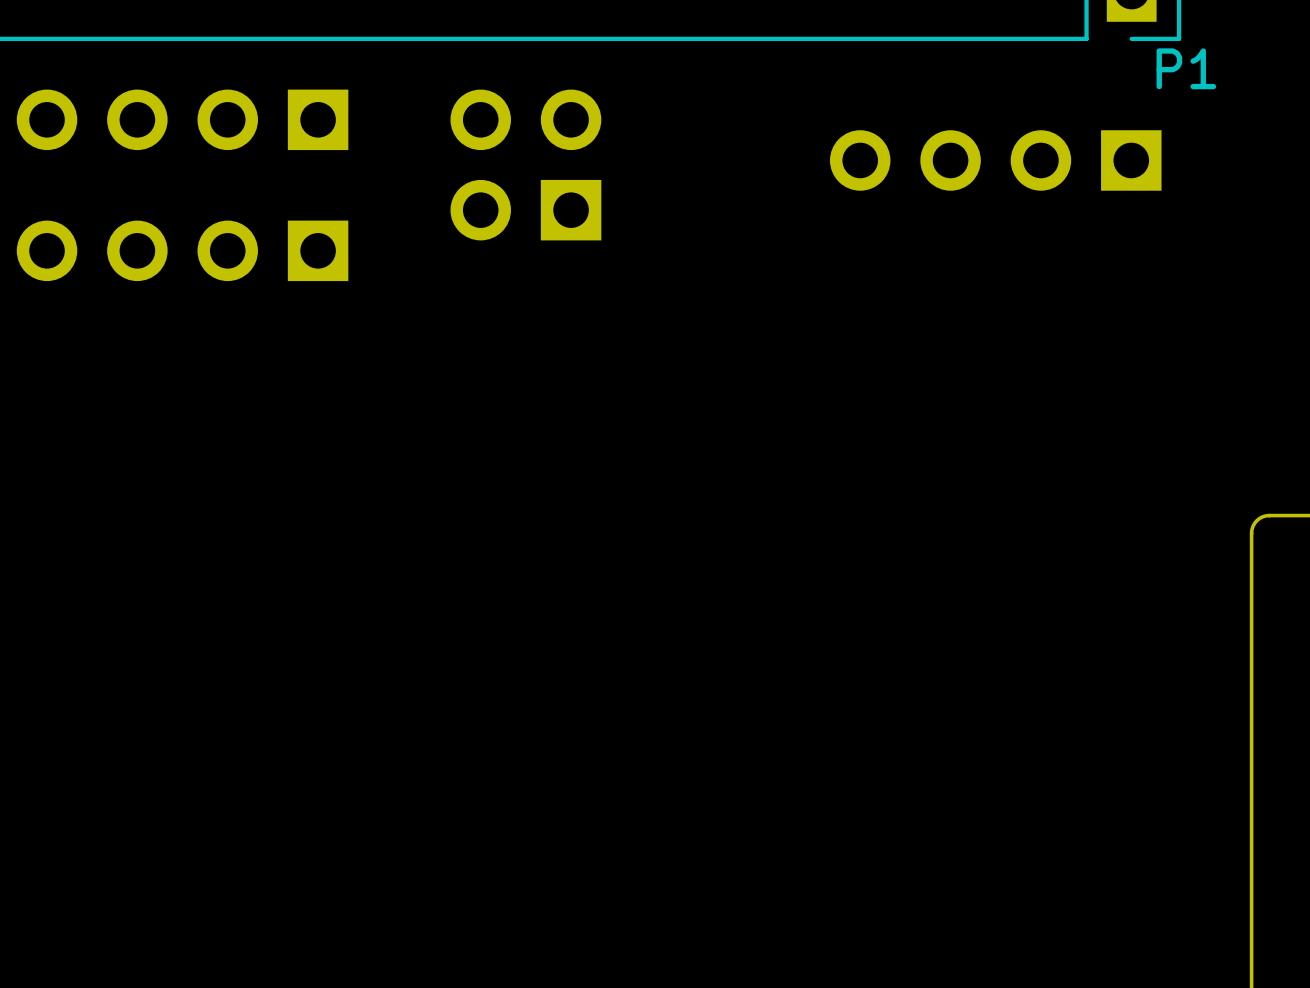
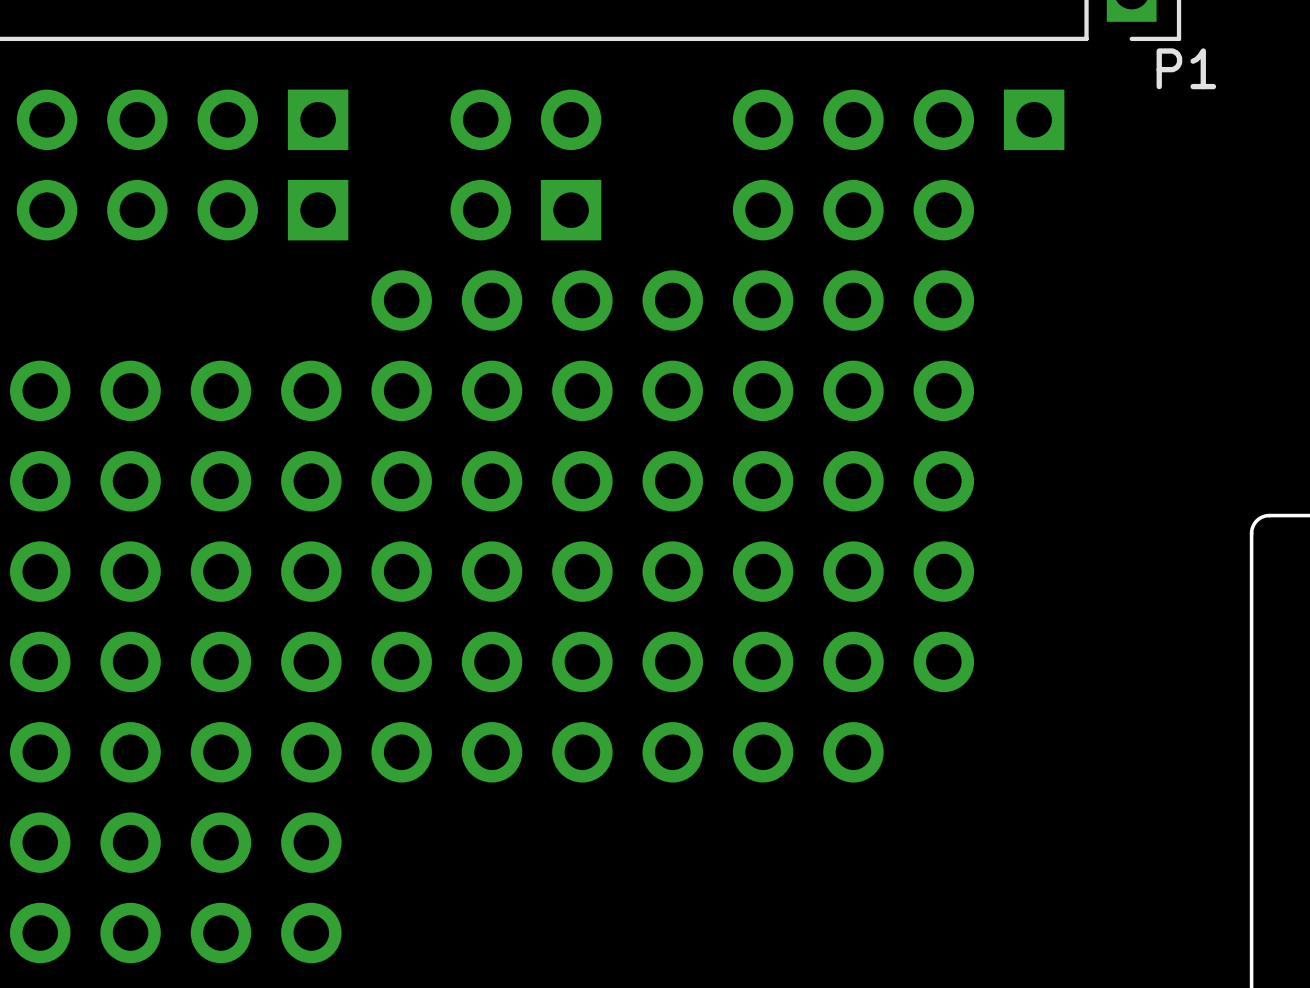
part position: (995, 160) -> (898, 119)
part: none -> (763, 210)
part: none -> (853, 210)
part: none -> (943, 210)
part position: (182, 250) -> (182, 210)
part: none -> (401, 300)
part: none -> (492, 300)
part: none -> (582, 300)
part: none -> (672, 300)
part: none -> (763, 300)
part: none -> (853, 300)
part: none -> (943, 300)
part: none -> (40, 390)
part: none -> (130, 390)
part: none -> (220, 390)
part: none -> (311, 390)
part: none -> (401, 390)
part: none -> (492, 390)
part: none -> (582, 390)
part: none -> (672, 390)
part: none -> (763, 390)
part: none -> (853, 390)
part: none -> (943, 390)
part: none -> (40, 481)
part: none -> (130, 481)
part: none -> (220, 481)
part: none -> (311, 481)
part: none -> (401, 481)
part: none -> (492, 481)
part: none -> (582, 481)
part: none -> (672, 481)
part: none -> (763, 481)
part: none -> (853, 481)
part: none -> (943, 481)
part: none -> (40, 571)
part: none -> (130, 571)
part: none -> (220, 571)
part: none -> (311, 571)
part: none -> (401, 571)
part: none -> (492, 571)
part: none -> (582, 571)
part: none -> (672, 571)
part: none -> (763, 571)
part: none -> (853, 571)
part: none -> (943, 571)
part: none -> (40, 661)
part: none -> (130, 661)
part: none -> (220, 661)
part: none -> (311, 661)
part: none -> (401, 661)
part: none -> (492, 661)
part: none -> (582, 661)
part: none -> (672, 661)
part: none -> (763, 661)
part: none -> (853, 661)
part: none -> (943, 661)
part: none -> (40, 752)
part: none -> (130, 752)
part: none -> (220, 752)
part: none -> (311, 752)
part: none -> (401, 752)
part: none -> (492, 752)
part: none -> (582, 752)
part: none -> (672, 752)
part: none -> (763, 752)
part: none -> (853, 752)
part: none -> (40, 842)
part: none -> (130, 842)
part: none -> (220, 842)
part: none -> (311, 842)
part: none -> (40, 933)
part: none -> (130, 933)
part: none -> (220, 933)
part: none -> (311, 933)

